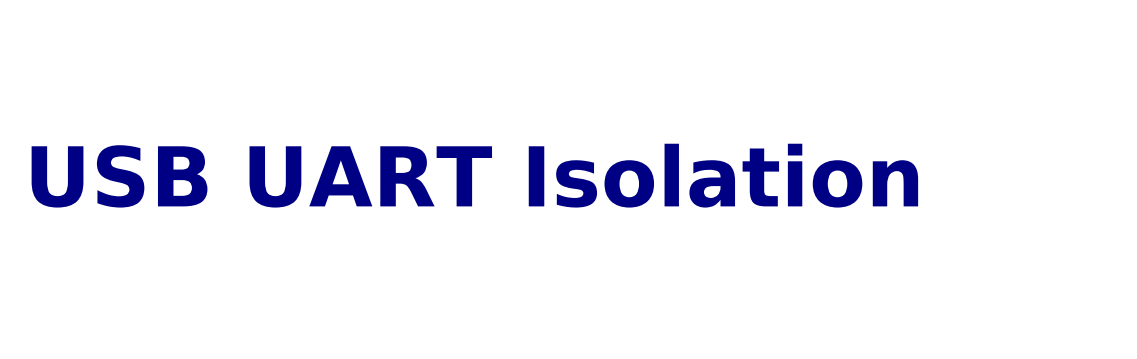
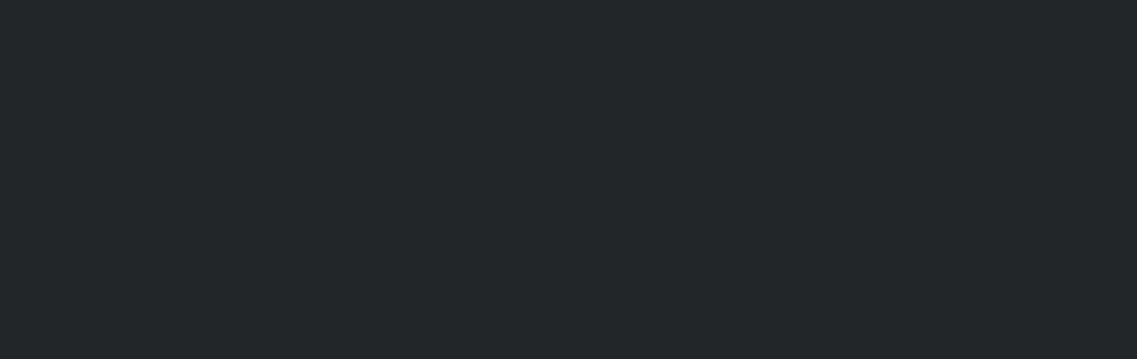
text: USB UART Isolation (474, 175) -> none

